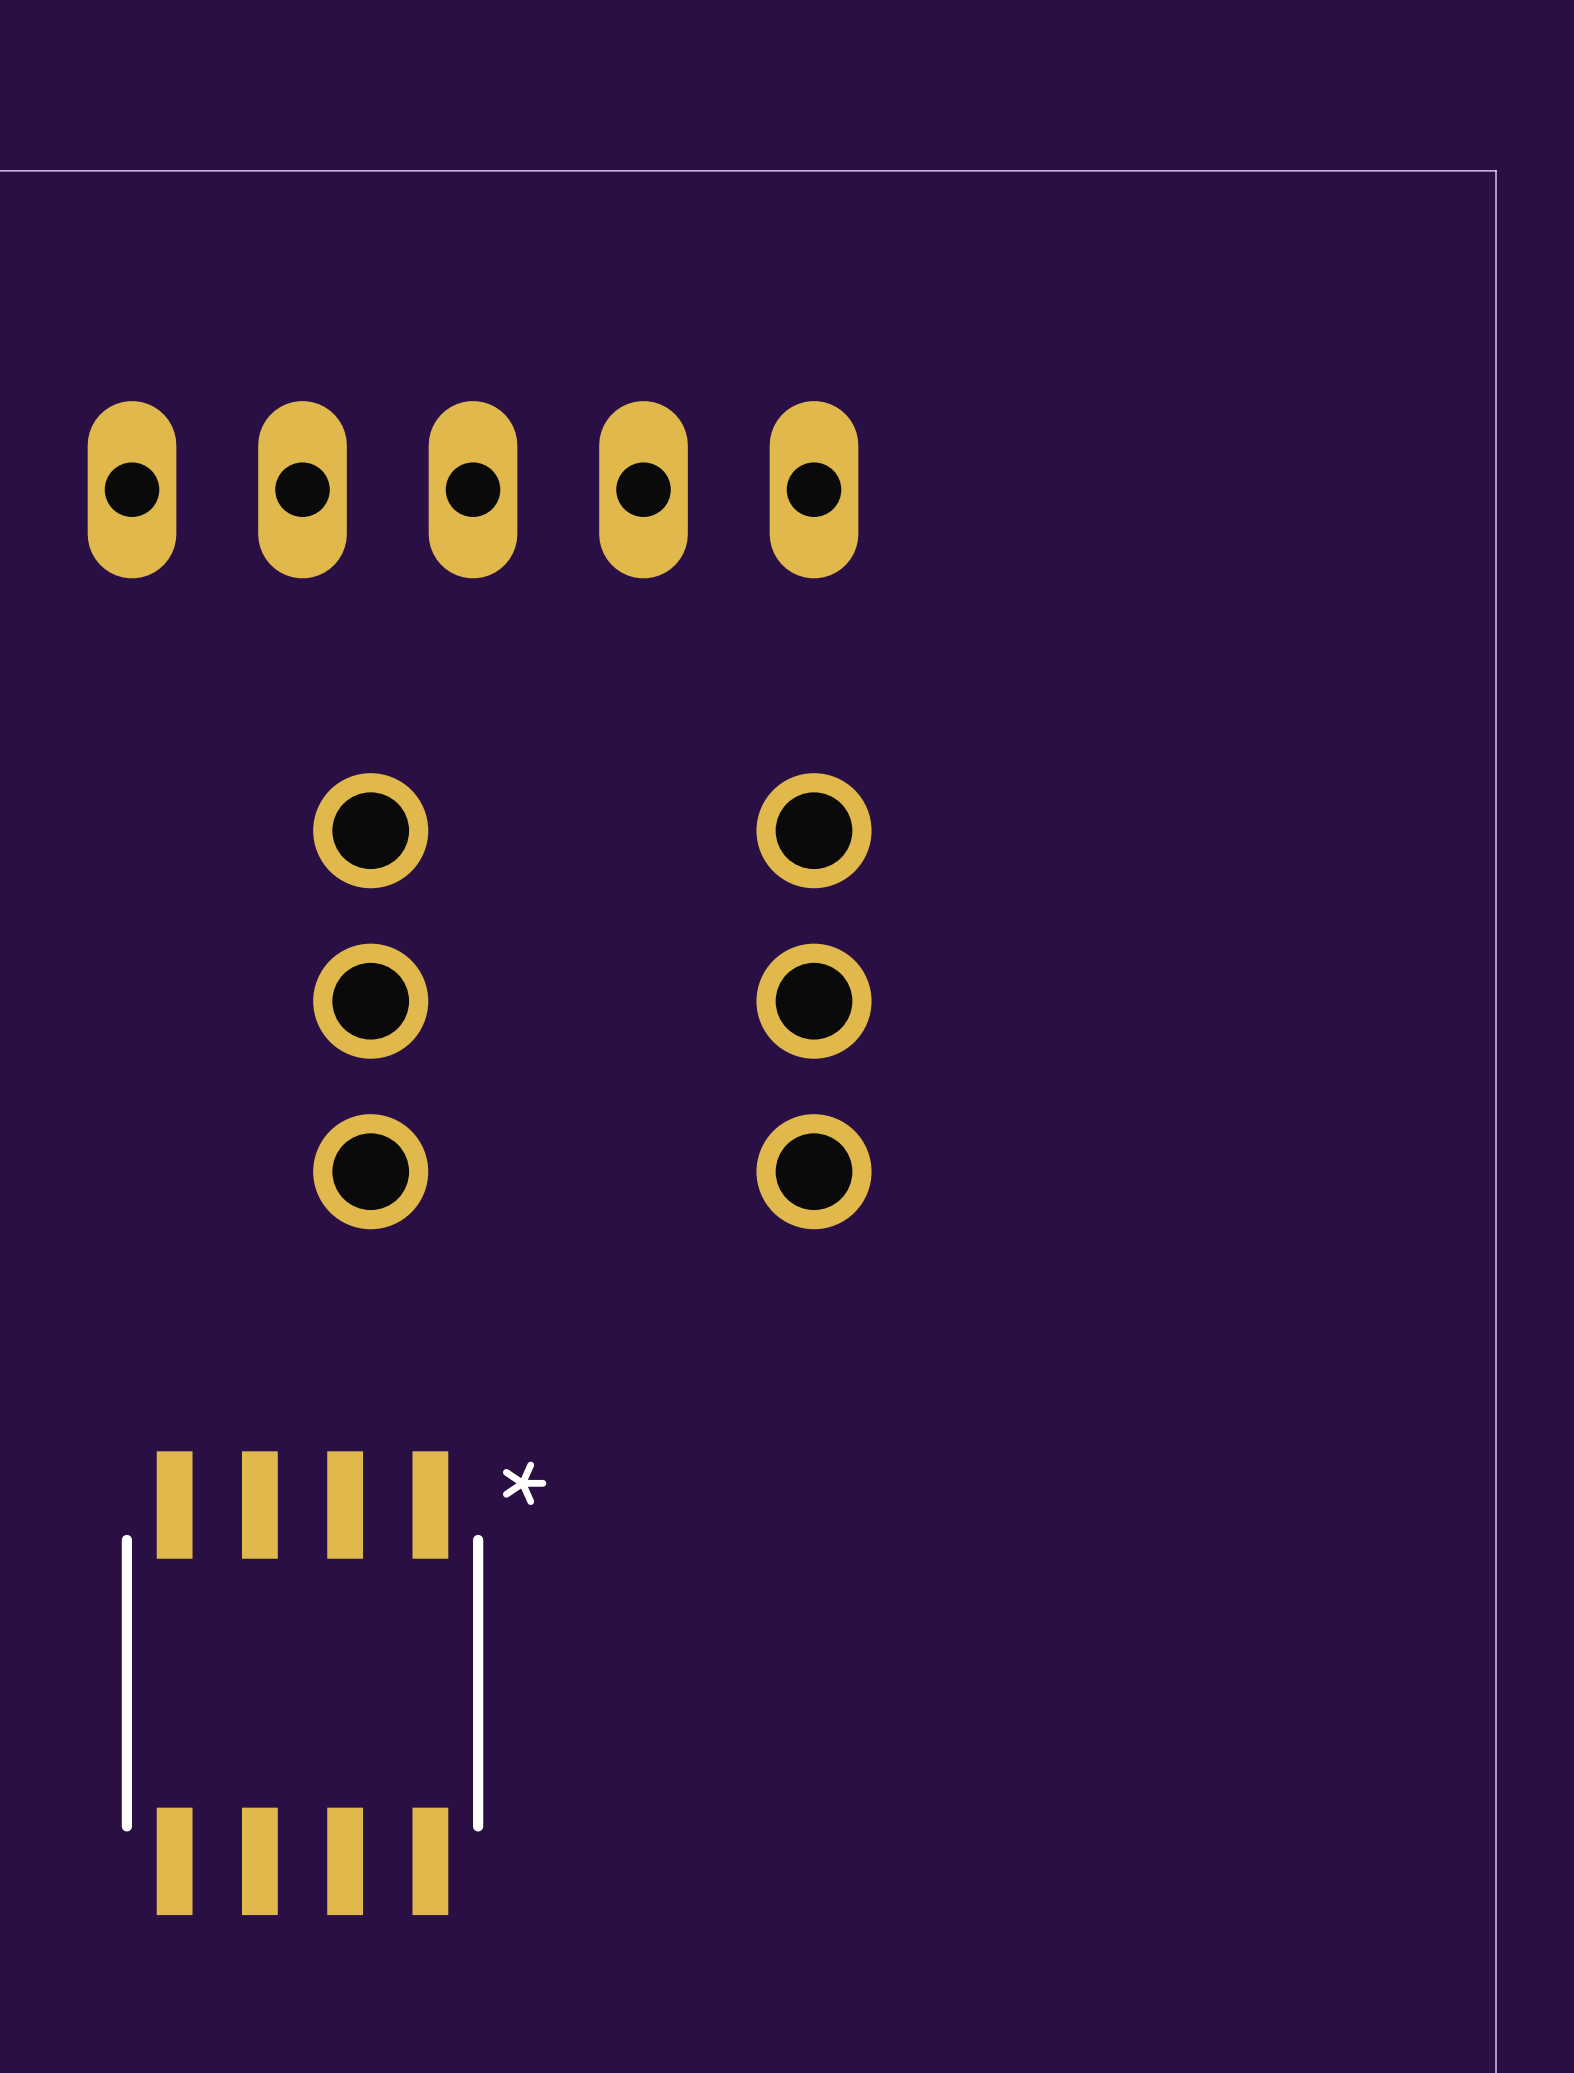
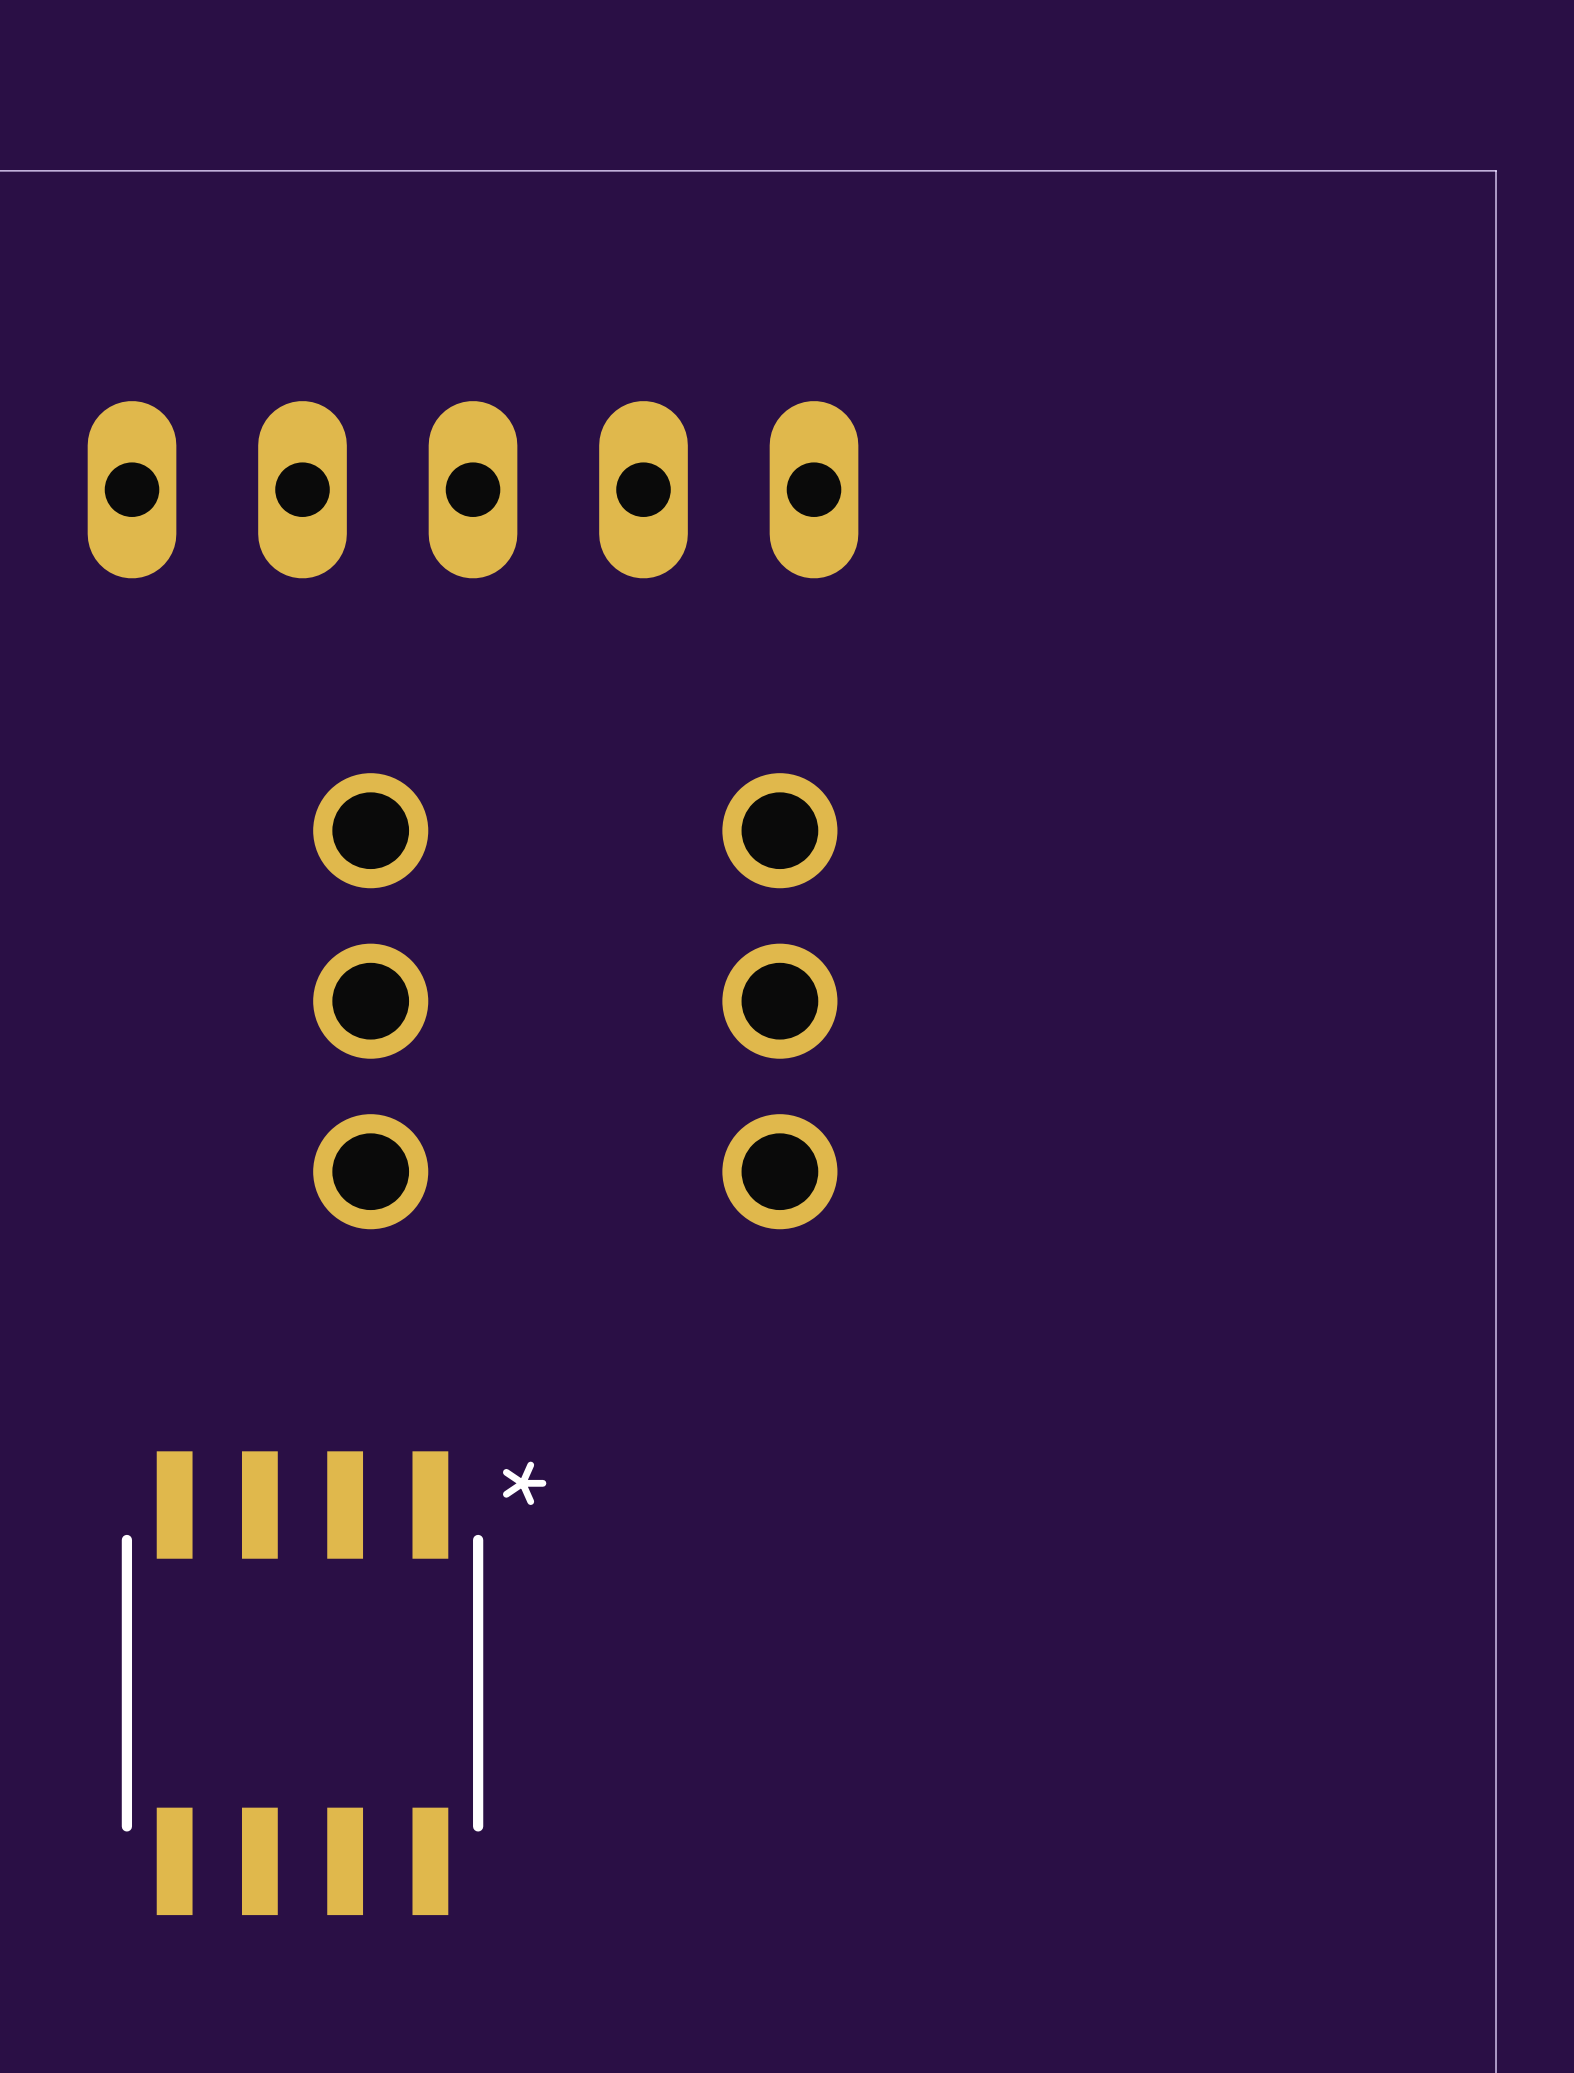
part position: (814, 1001) -> (779, 1001)

